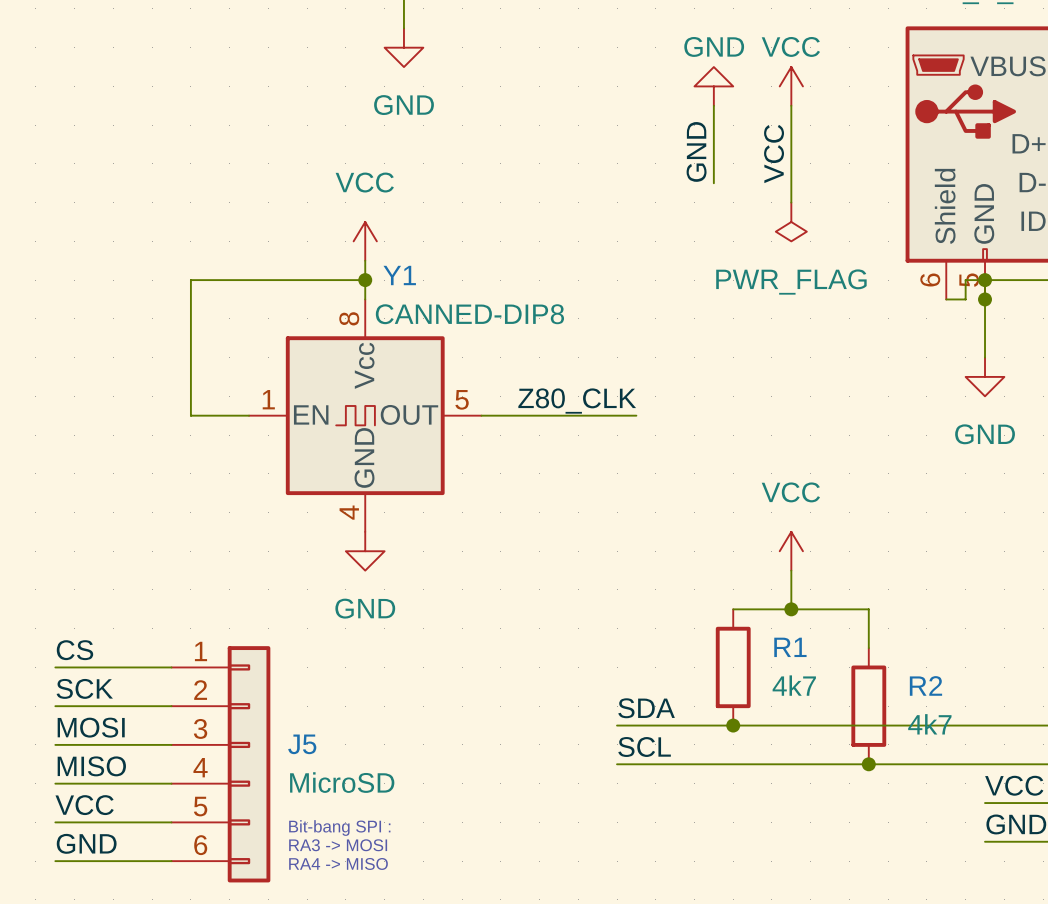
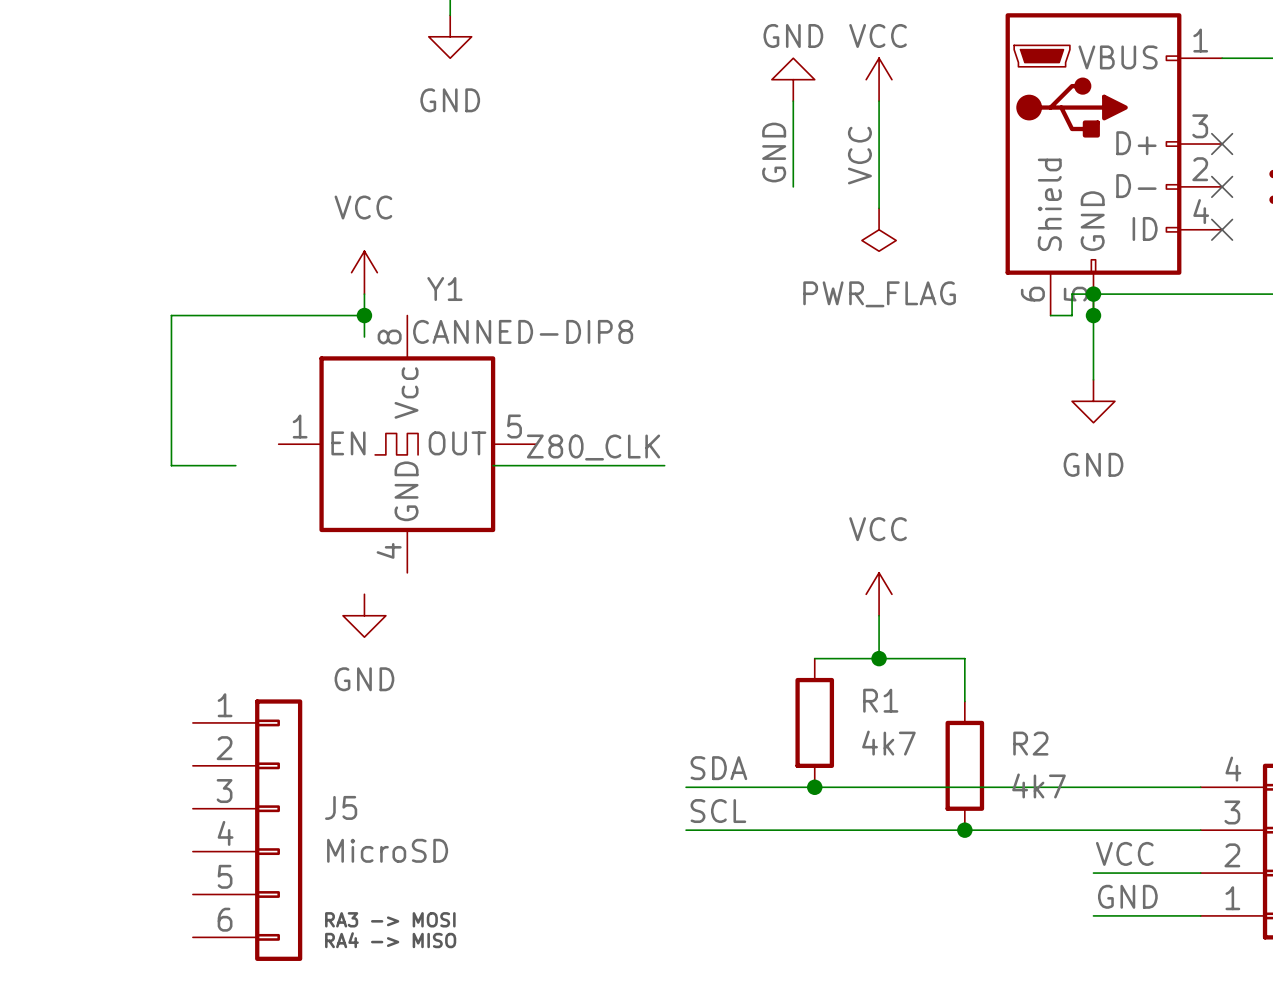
power symbol position: VCC (365, 241) -> VCC (364, 272)
wire: (365, 260) (365, 299) -> (364, 294) (364, 336)
wire: (365, 280) (190, 280) (190, 415) (249, 415) -> (364, 315) (171, 315) (171, 465) (235, 465)
junction position: (365, 280) -> (364, 315)
label position: Z80_CLK (577, 401) -> Z80_CLK (593, 447)
wire: (481, 415) (636, 415) -> (493, 465) (664, 465)
power symbol position: GND (365, 551) -> GND (364, 615)
label: CS (74, 650) -> none
wire: (55, 667) (171, 667) -> none
label: SCK (84, 688) -> none
wire: (55, 706) (171, 706) -> none
label: MOSI (91, 727) -> none
wire: (55, 744) (171, 744) -> none
label: MISO (91, 766) -> none
wire: (55, 783) (171, 783) -> none
label: VCC (84, 805) -> none
wire: (55, 822) (171, 822) -> none
text: Bit-bang SPI : (339, 827) -> none
label: GND (86, 843) -> none
wire: (55, 861) (171, 861) -> none

